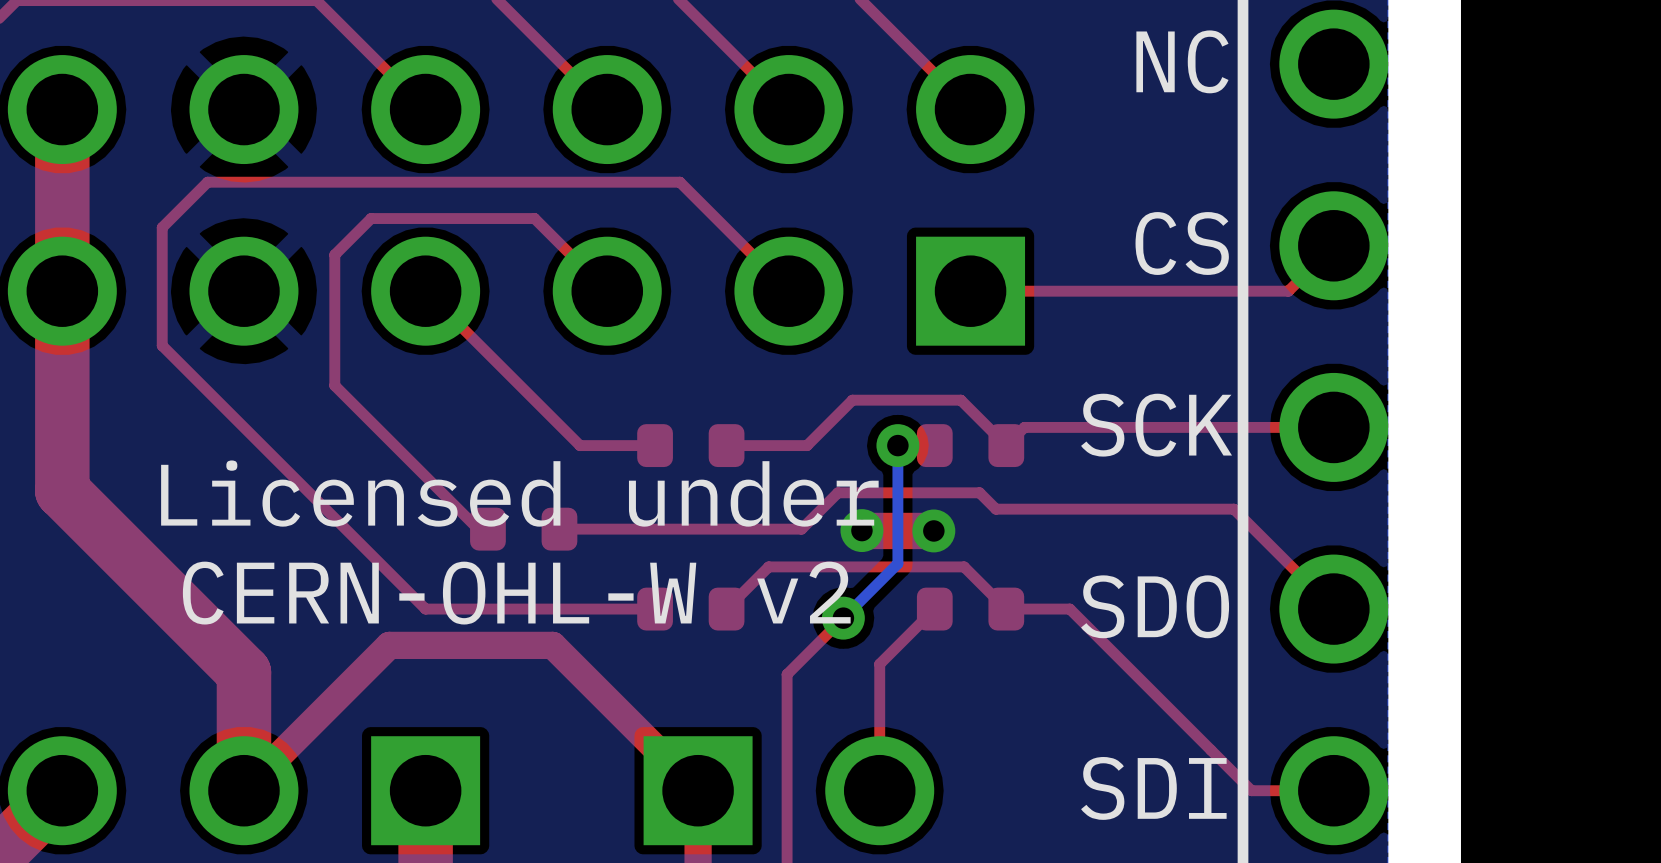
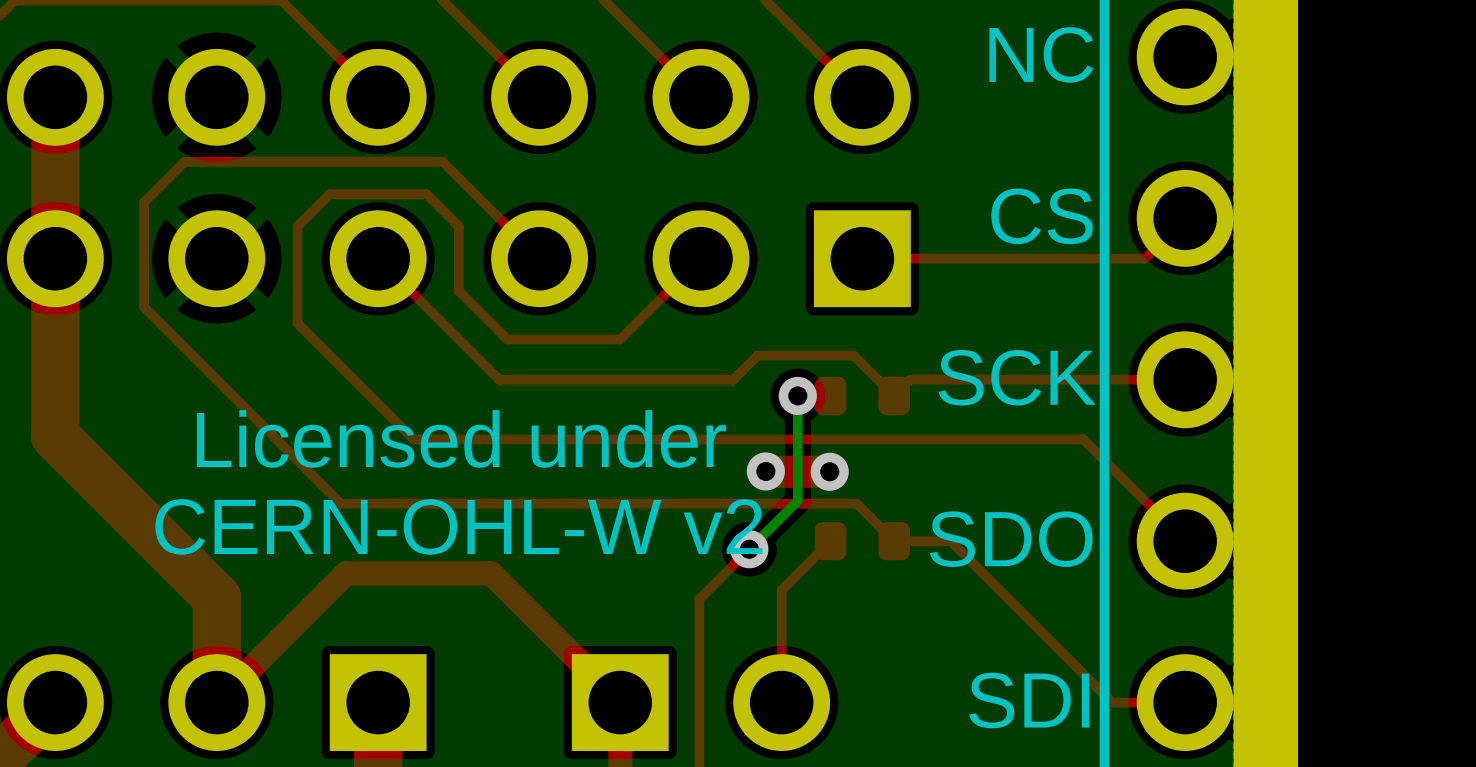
top track: (498, 182) (679, 182) (788, 291) -> (426, 194) (458, 226) (458, 291) (507, 339) (620, 339) (700, 258)
top track: (534, 218) (480, 218) -> (475, 194) (442, 161)
top track: (334, 363) (334, 385) (478, 529) (487, 529) -> none
top track: (561, 427) (580, 445) (655, 445) -> none
top track: (825, 427) (807, 445) (726, 445) -> (733, 379) (499, 379)
part: (690, 445) -> none
top track: (1233, 509) (995, 509) (979, 492) (837, 492) (801, 529) (559, 529) -> (1096, 452) (1083, 439) (413, 439) (297, 323)
part: (523, 529) -> none
top track: (383, 566) (425, 609) (655, 609) -> (340, 503) (683, 503)
top track: (768, 566) (726, 609) -> none
part: (690, 609) -> none

